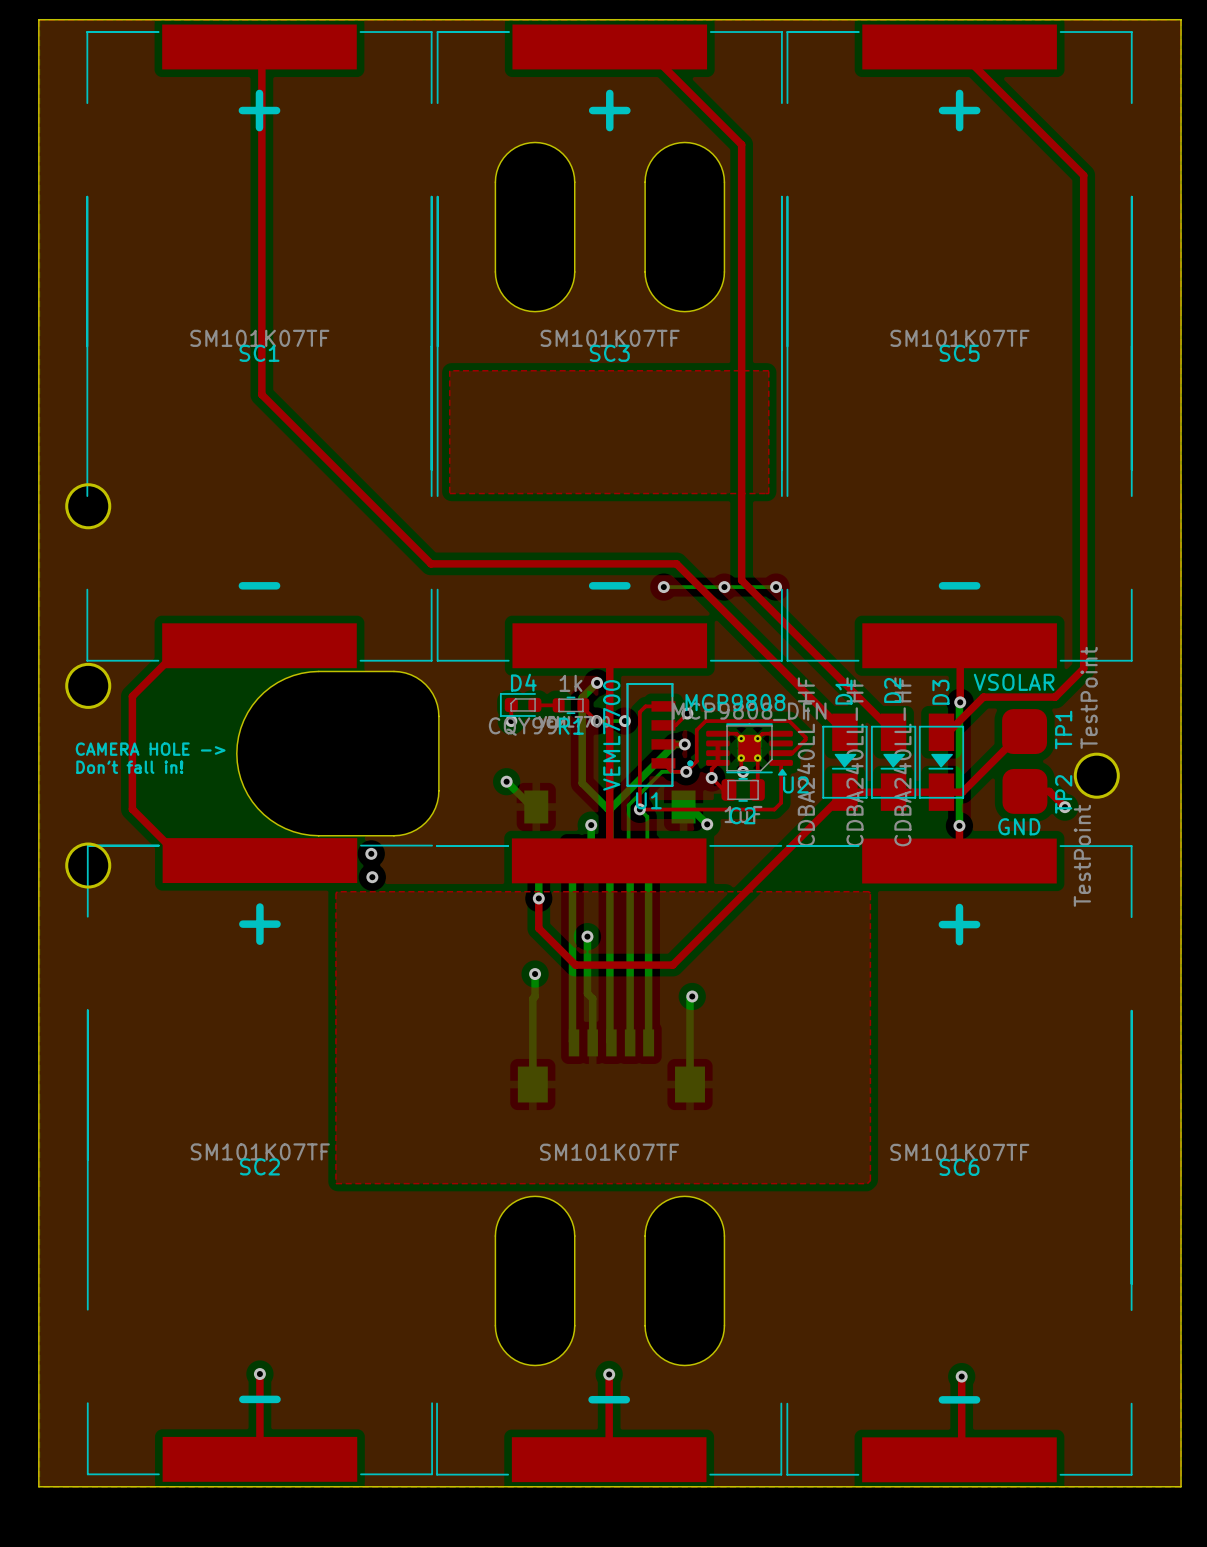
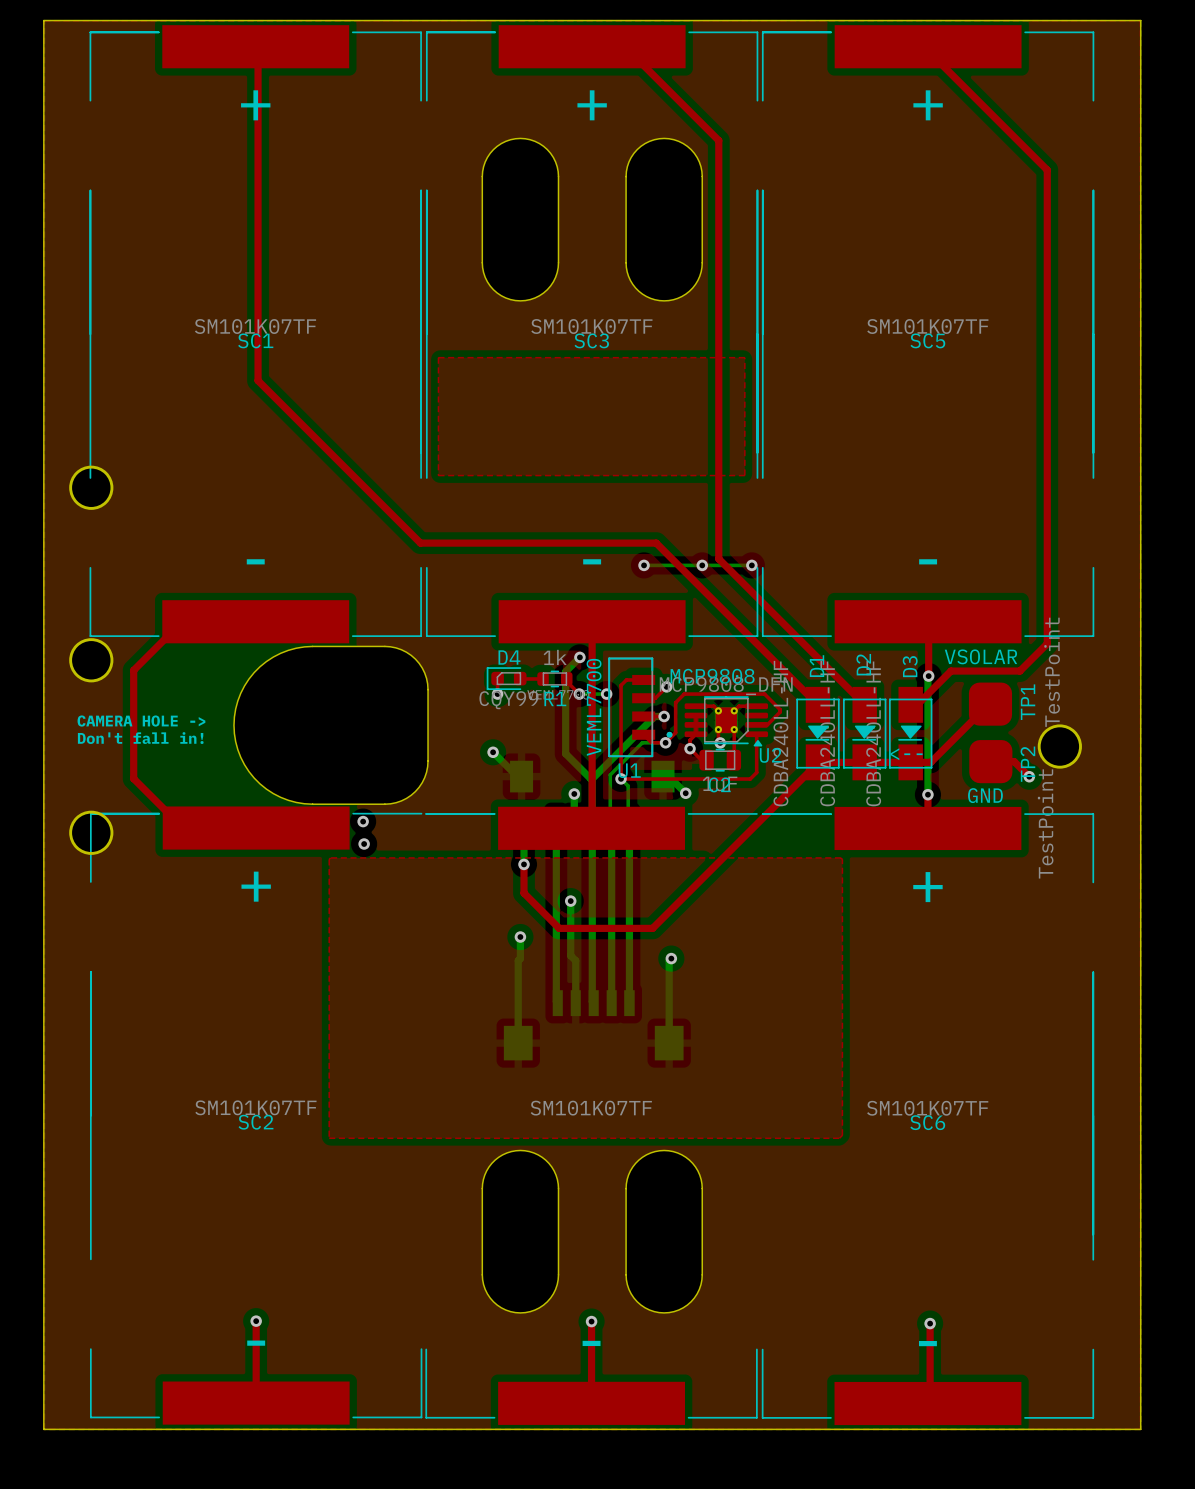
text: none -> <-- (906, 754)

